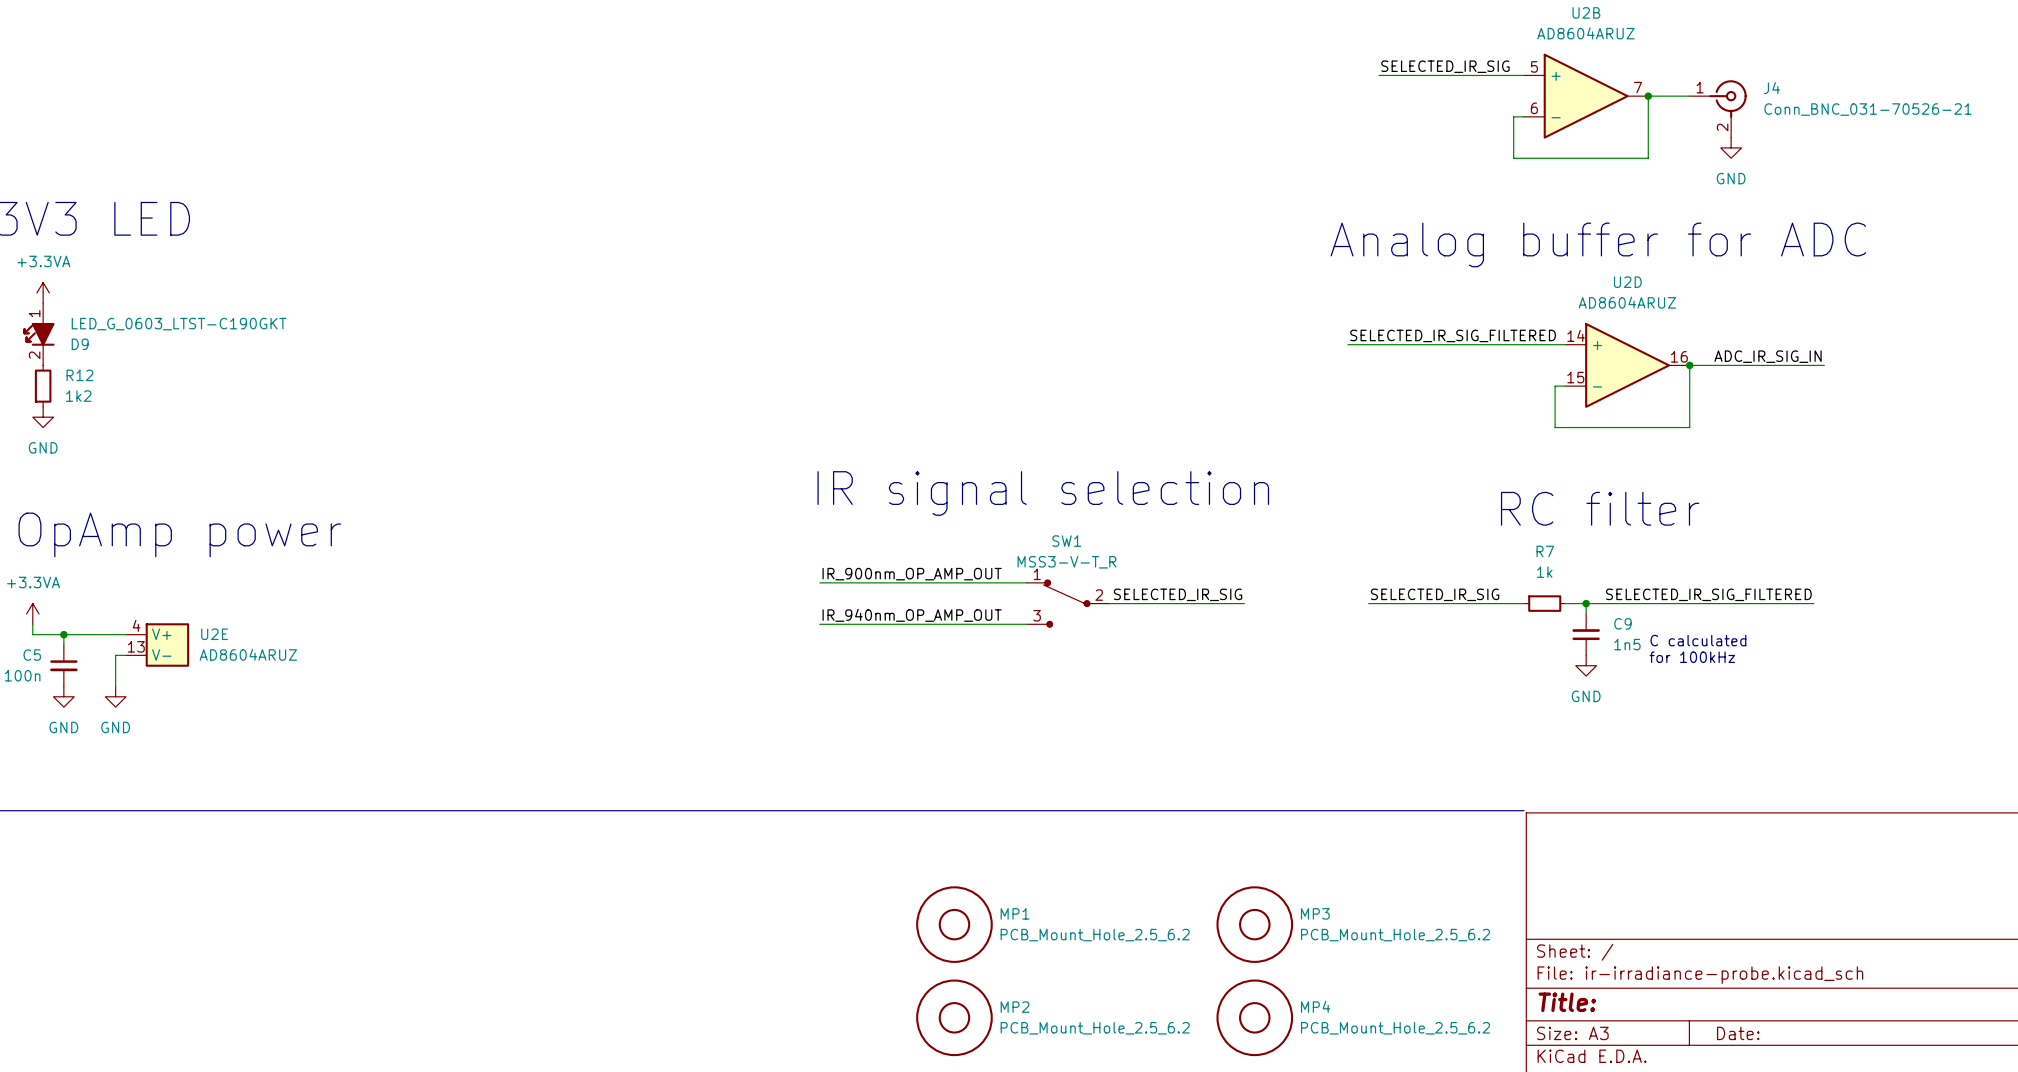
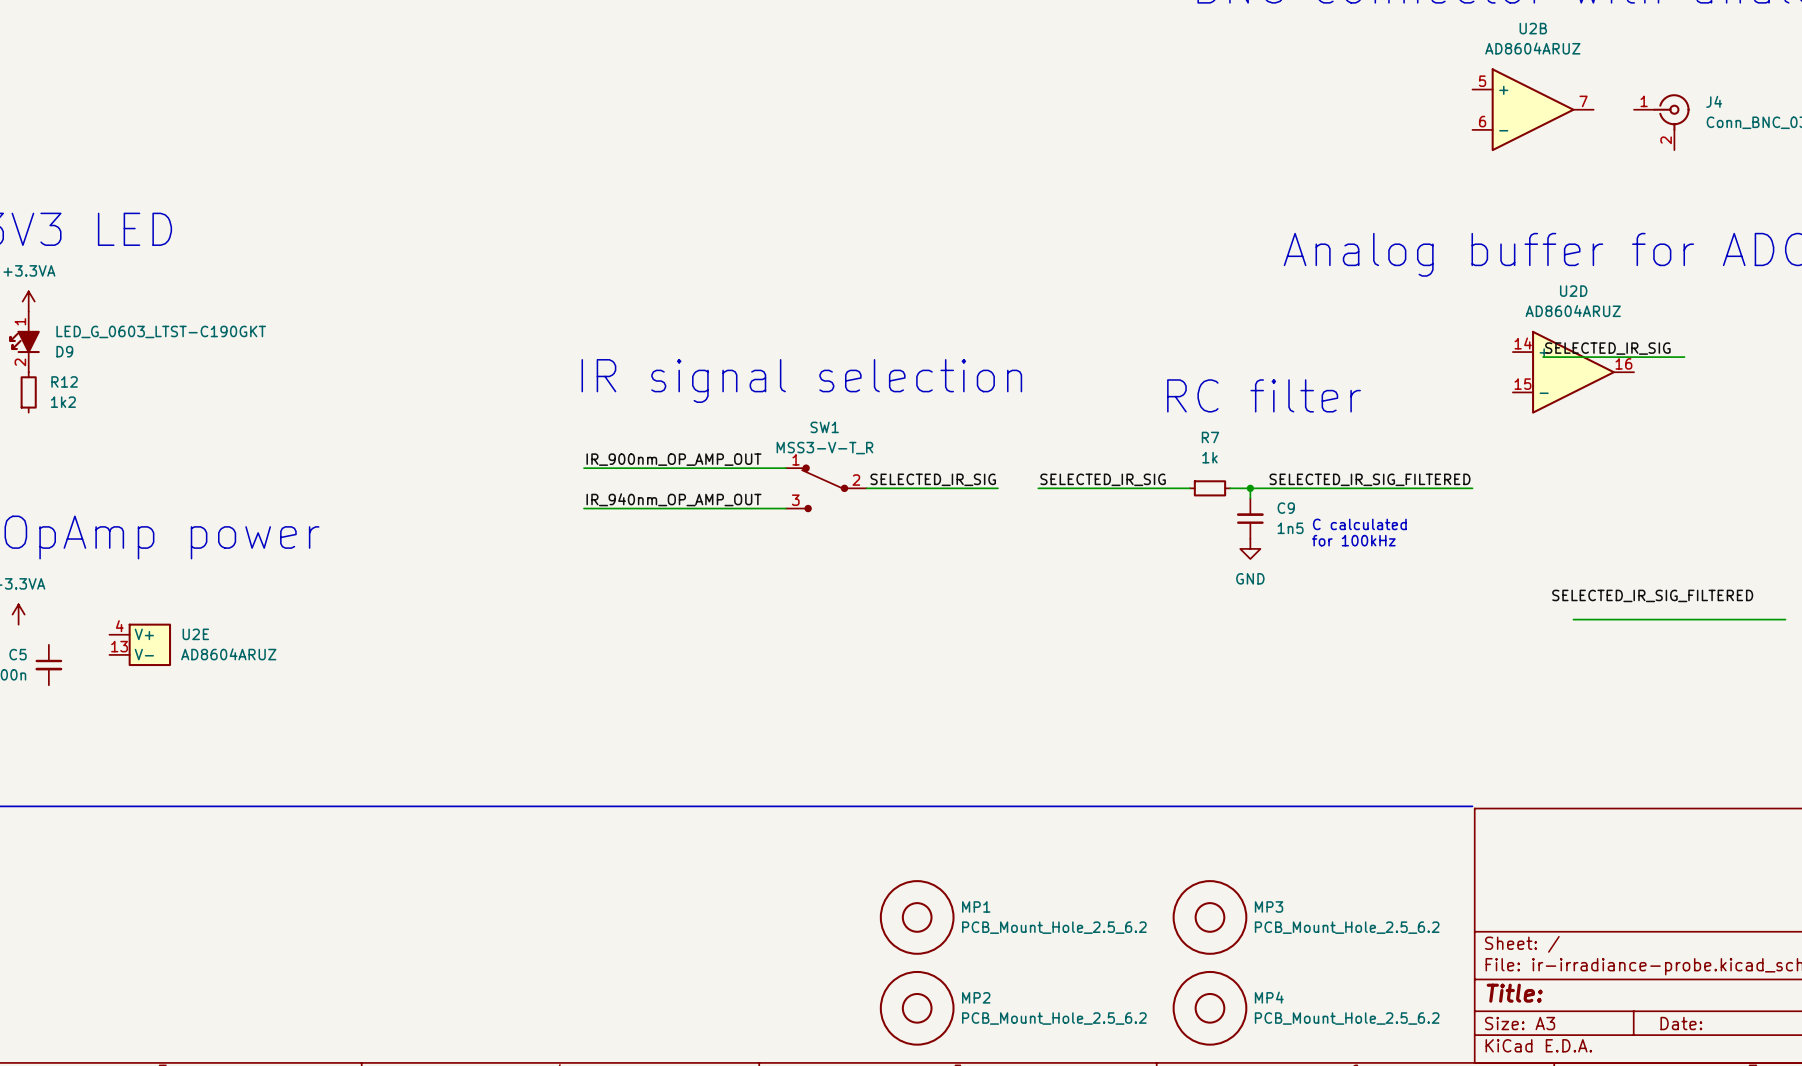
label: SELECTED_IR_SIG (1445, 66) -> none
wire: (1379, 75) (1524, 75) -> none
junction: (1648, 96) -> none
wire: (1689, 96) (1648, 96) (1648, 158) (1513, 158) (1513, 116) (1524, 116) -> none
power symbol: GND (1731, 147) -> none
label: SELECTED_IR_SIG_FILTERED (1453, 335) -> none
label: none -> SELECTED_IR_SIG (1607, 348)
wire: (1347, 344) (1565, 344) -> none
wire: none -> (1543, 357) (1684, 357)
label: ADC_IR_SIG_IN (1768, 356) -> none
junction: (1689, 365) -> none
wire: (1824, 365) (1689, 365) (1689, 427) (1555, 427) (1555, 386) (1565, 386) -> none
text: none -> IR signal selection (801, 381)
text: none -> RC filter (1264, 395)
power symbol: GND (43, 417) -> none
label: none -> IR_900nm_OP_AMP_OUT (673, 459)
wire: none -> (583, 468) (785, 468)
label: none -> SELECTED_IR_SIG (933, 479)
label: none -> SELECTED_IR_SIG (1103, 479)
label: none -> SELECTED_IR_SIG_FILTERED (1370, 479)
wire: none -> (866, 488) (997, 488)
wire: none -> (1038, 488) (1189, 488)
wire: none -> (1230, 488) (1472, 488)
wire: none -> (1250, 488) (1250, 498)
junction: none -> (1250, 488)
text: IR signal selection (1043, 493) -> none
label: none -> IR_940nm_OP_AMP_OUT (673, 499)
wire: none -> (583, 508) (785, 508)
text: RC filter (1600, 508) -> none
text: none -> C calculated (1359, 524)
text: none -> for 100kHz (1353, 540)
power symbol: none -> GND (1250, 548)
label: IR_900nm_OP_AMP_OUT (912, 574) -> none
wire: (819, 582) (1026, 582) -> none
label: SELECTED_IR_SIG (1178, 594) -> none
label: SELECTED_IR_SIG (1435, 594) -> none
SW1 position: (1068, 603) -> (826, 488)
wire: (1109, 603) (1244, 603) -> none
wire: (1368, 603) (1524, 603) -> none
R7 position: (1544, 603) -> (1209, 488)
wire: (1565, 603) (1813, 603) -> none
wire: (1586, 603) (1586, 613) -> none
junction: (1586, 603) -> none
label: IR_940nm_OP_AMP_OUT (912, 615) -> none
wire: none -> (1573, 619) (1785, 619)
wire: (32, 624) (32, 634) (125, 634) -> none
wire: (819, 624) (1026, 624) -> none
wire: (63, 634) (63, 645) -> none
junction: (63, 634) -> none
C9 position: (1586, 634) -> (1250, 518)
text: C calculated (1698, 640) -> none
wire: (125, 655) (115, 655) (115, 686) -> none
text: for 100kHz (1692, 657) -> none
power symbol: GND (1586, 665) -> none
power symbol: GND (63, 696) -> none
power symbol: GND (115, 696) -> none

